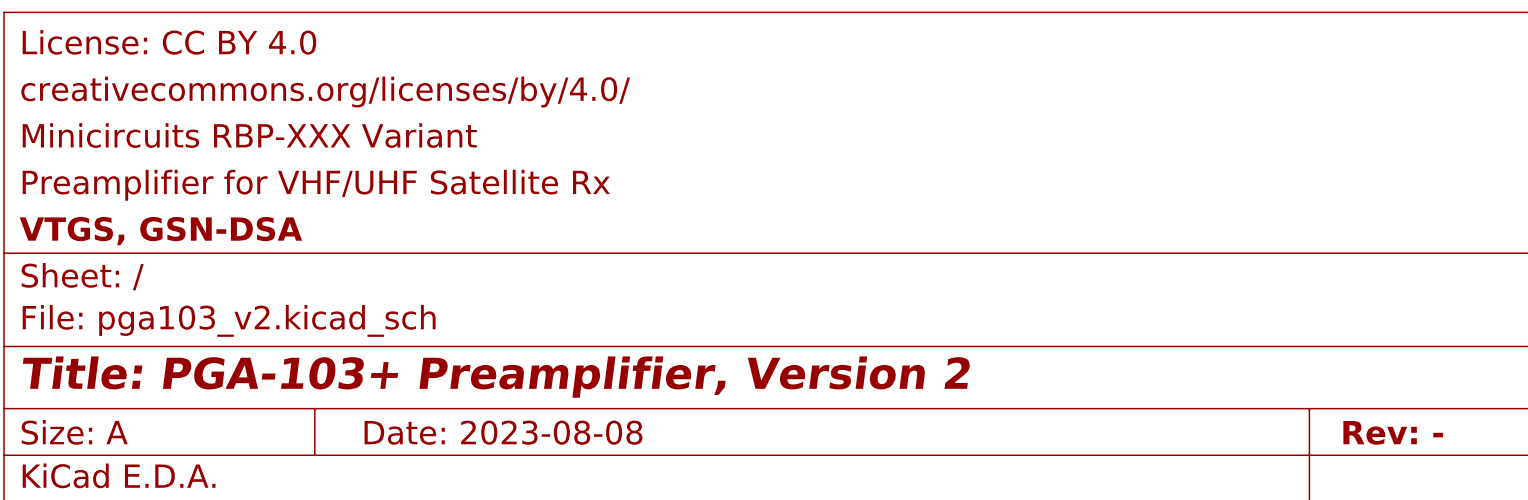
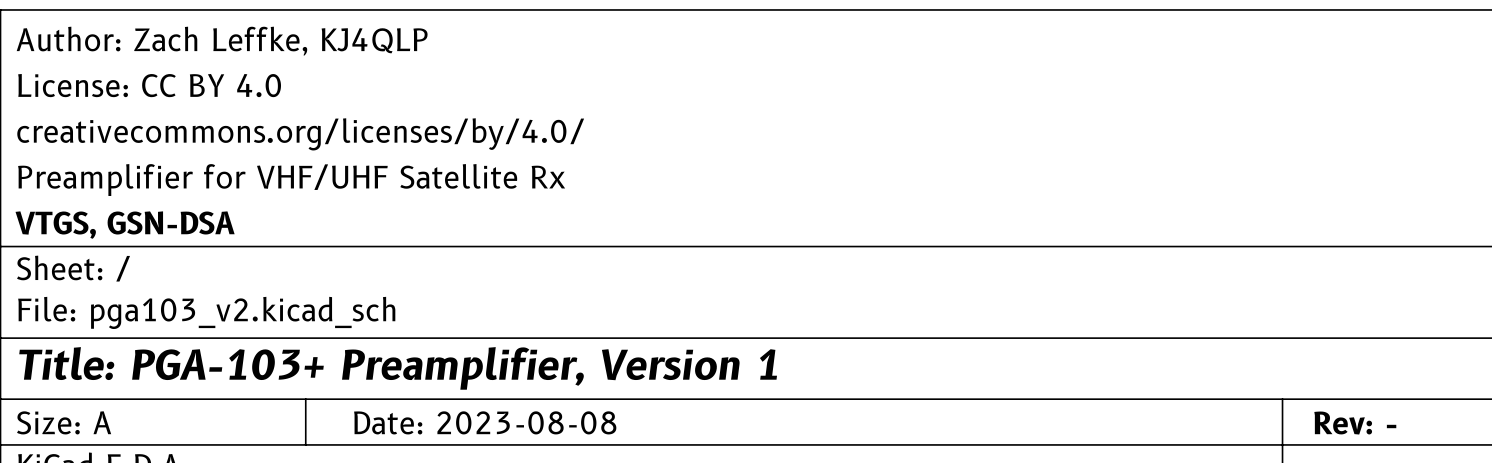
title block: License: CC BY 4.0 (169, 42) -> Author: Zach Leffke, KJ4QLP (222, 41)
title block: creativecommons.org/licenses/by/4.0/ (325, 92) -> License: CC BY 4.0 (149, 85)
title block: Minicircuits RBP-XXX Variant (249, 135) -> creativecommons.org/licenses/by/4.0/ (300, 134)
title block: Title: PGA-103+ Preamplifier, Version 2 (496, 377) -> Title: PGA-103+ Preamplifier, Version 1 (398, 368)

